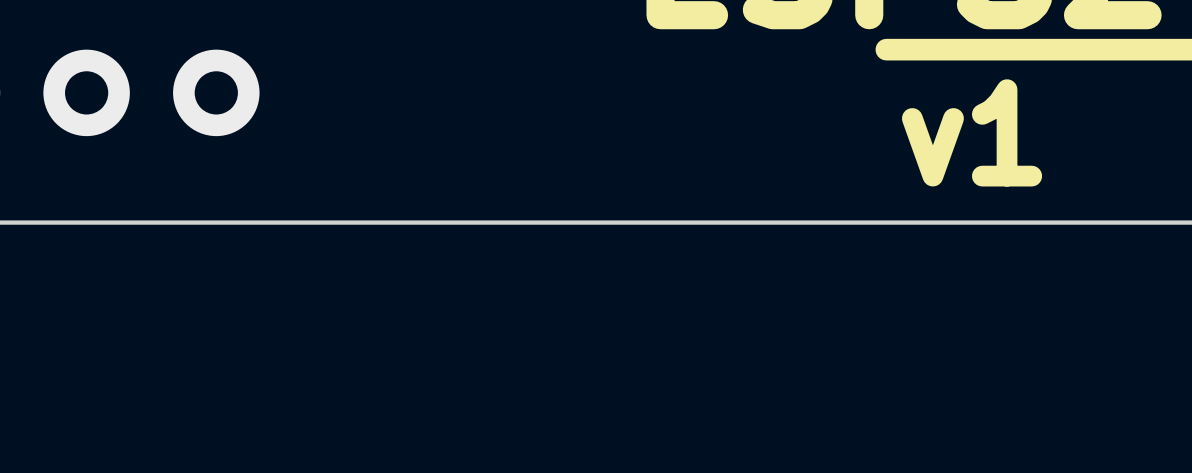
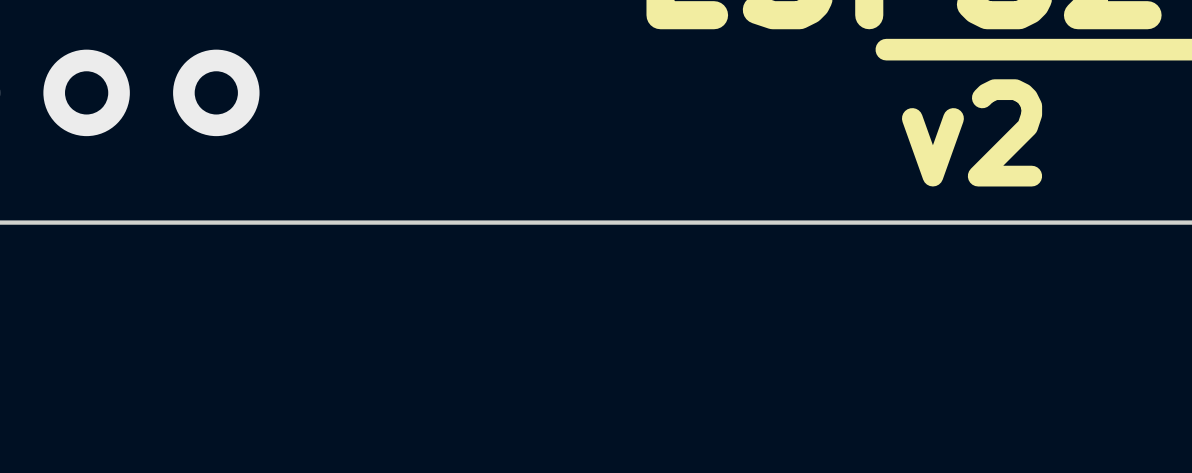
text: v1 (972, 132) -> v2 (972, 132)

